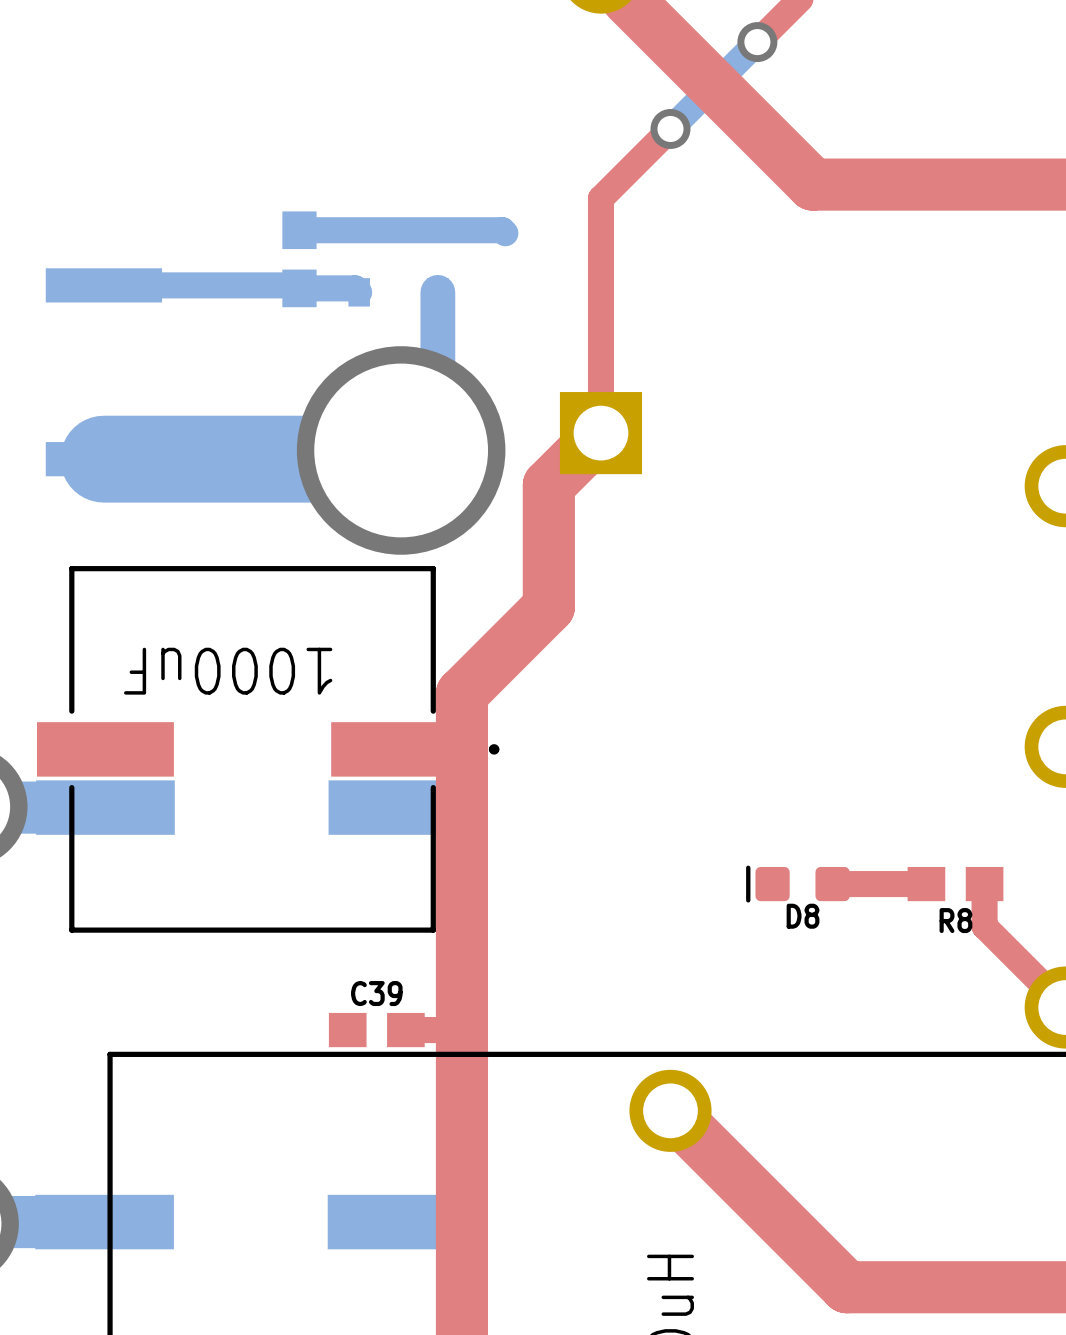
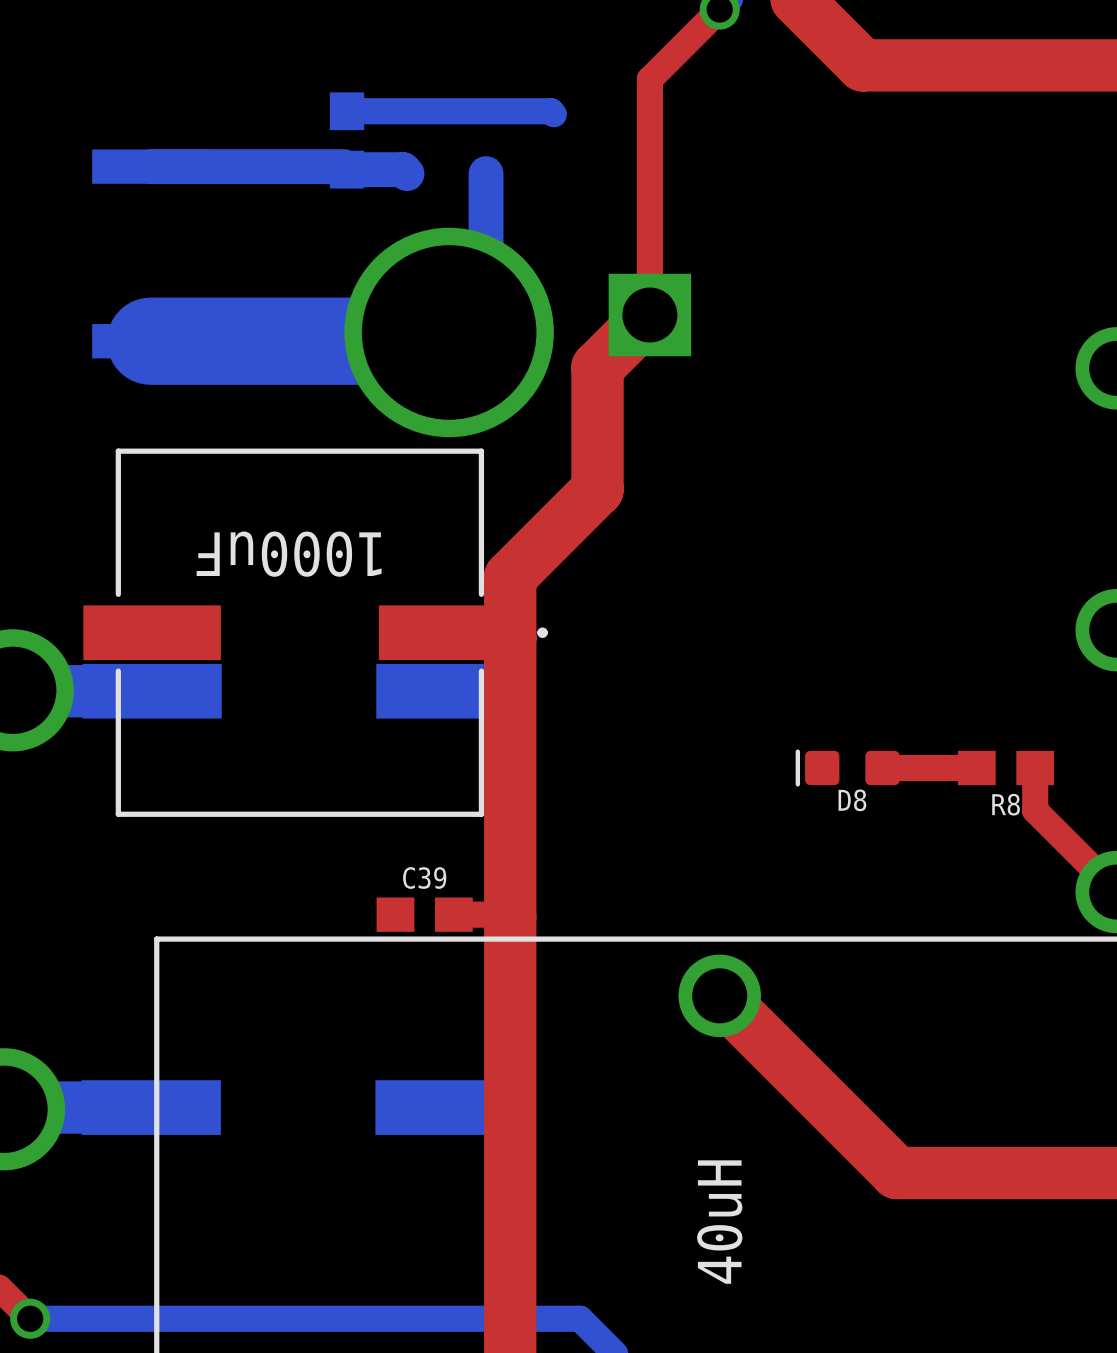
bottom track width: thin (103, 285) (296, 285) -> thick (150, 166) (343, 166)
bottom track width: thin (299, 288) (355, 288) (359, 292) -> thick (347, 169) (403, 169) (407, 173)

